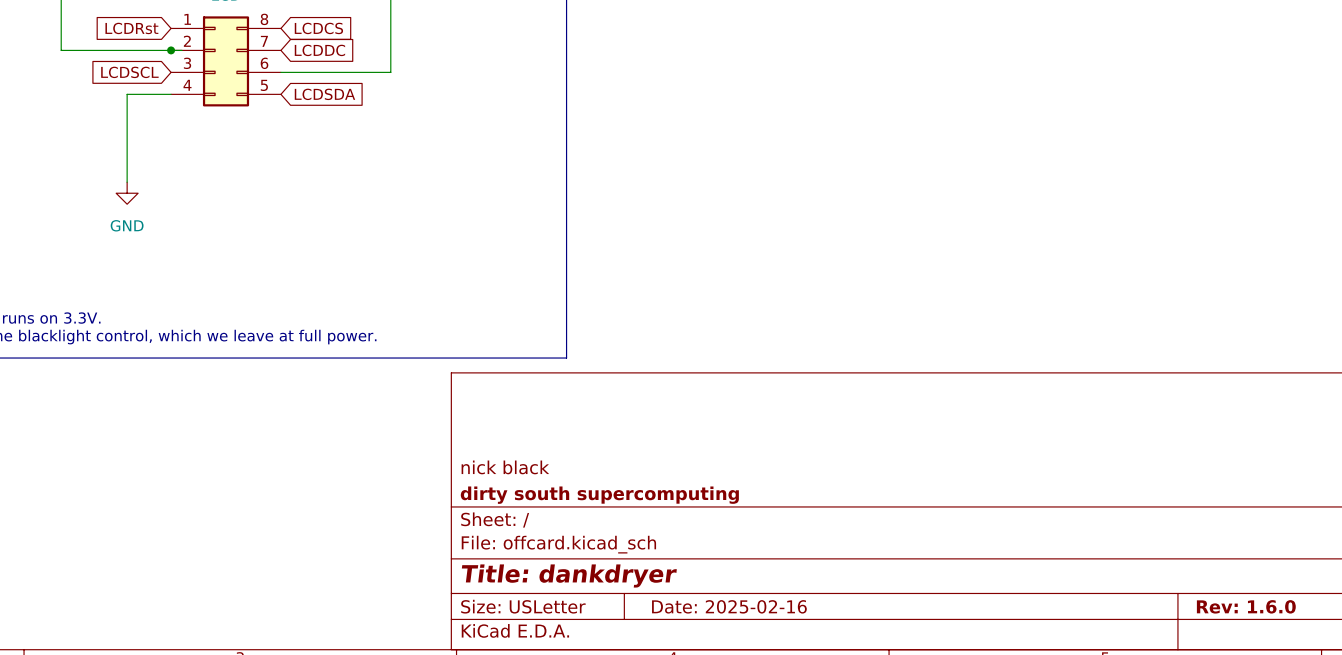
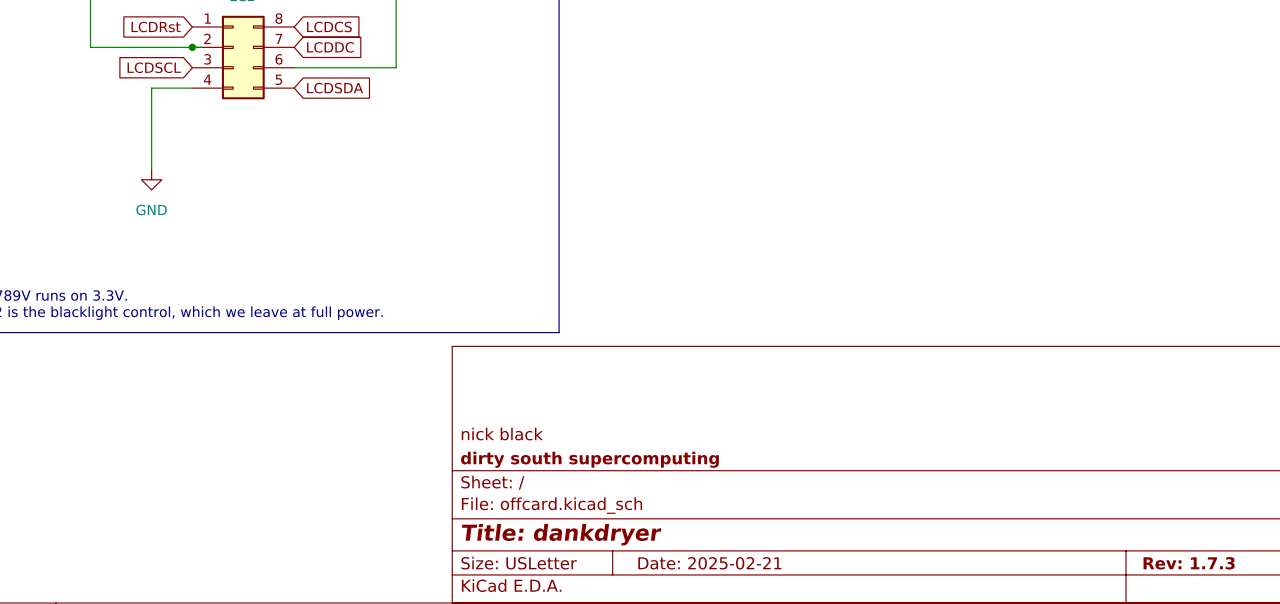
title block: Date: 2025-02-16 (729, 606) -> Date: 2025-02-21 (709, 563)
title block: Rev: 1.6.0 (1246, 606) -> Rev: 1.7.3 (1189, 563)

